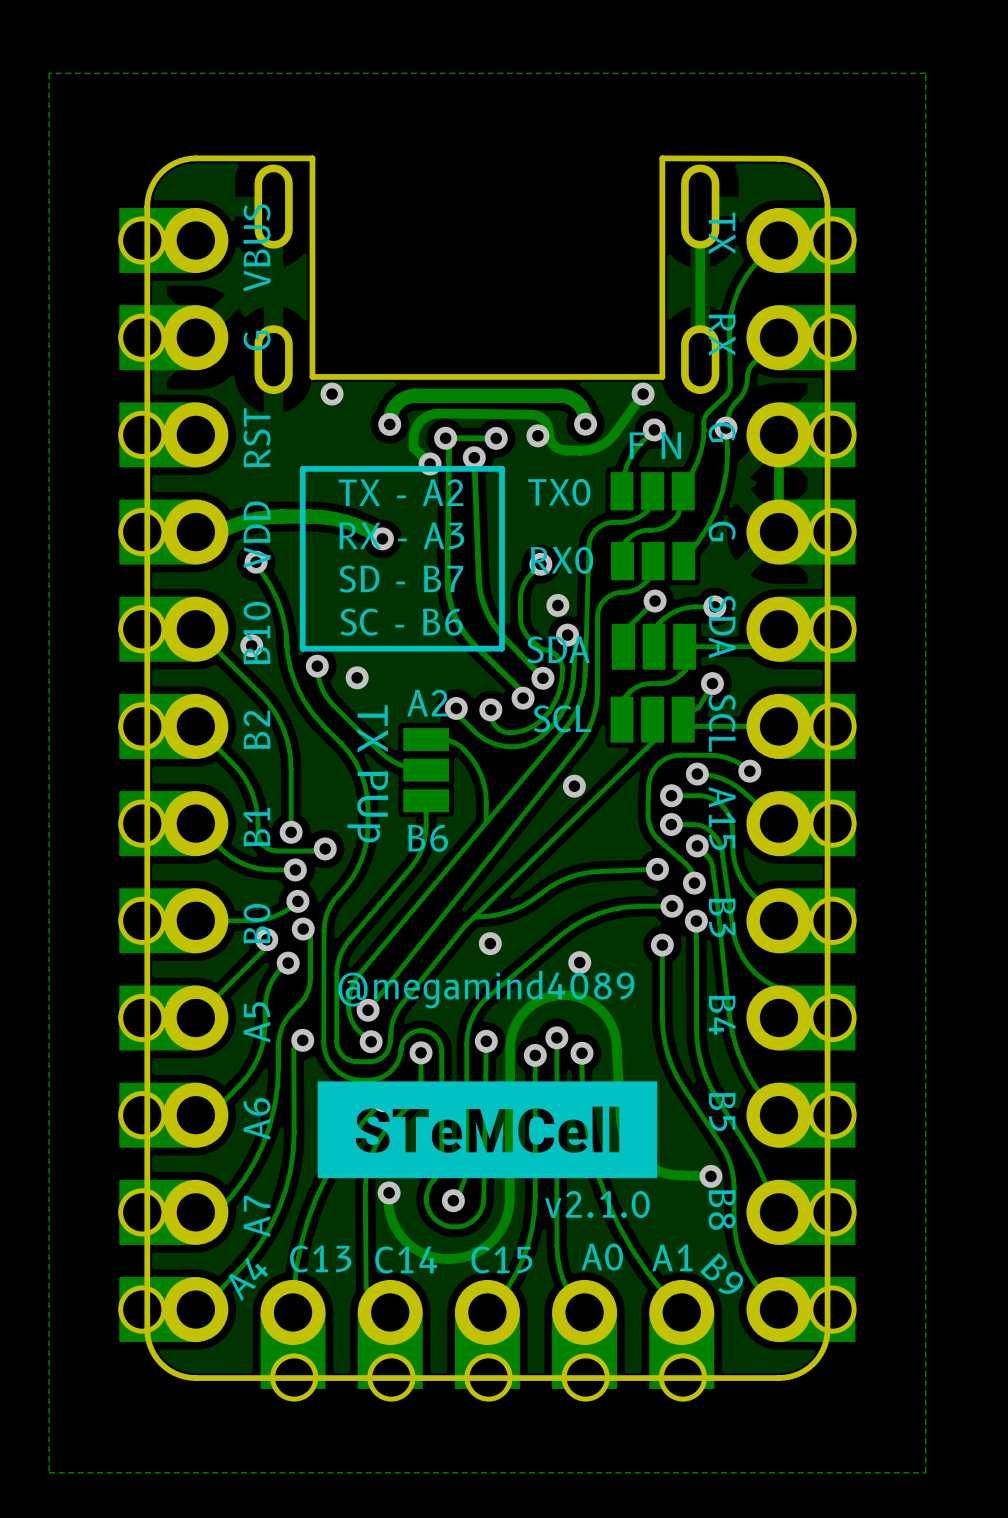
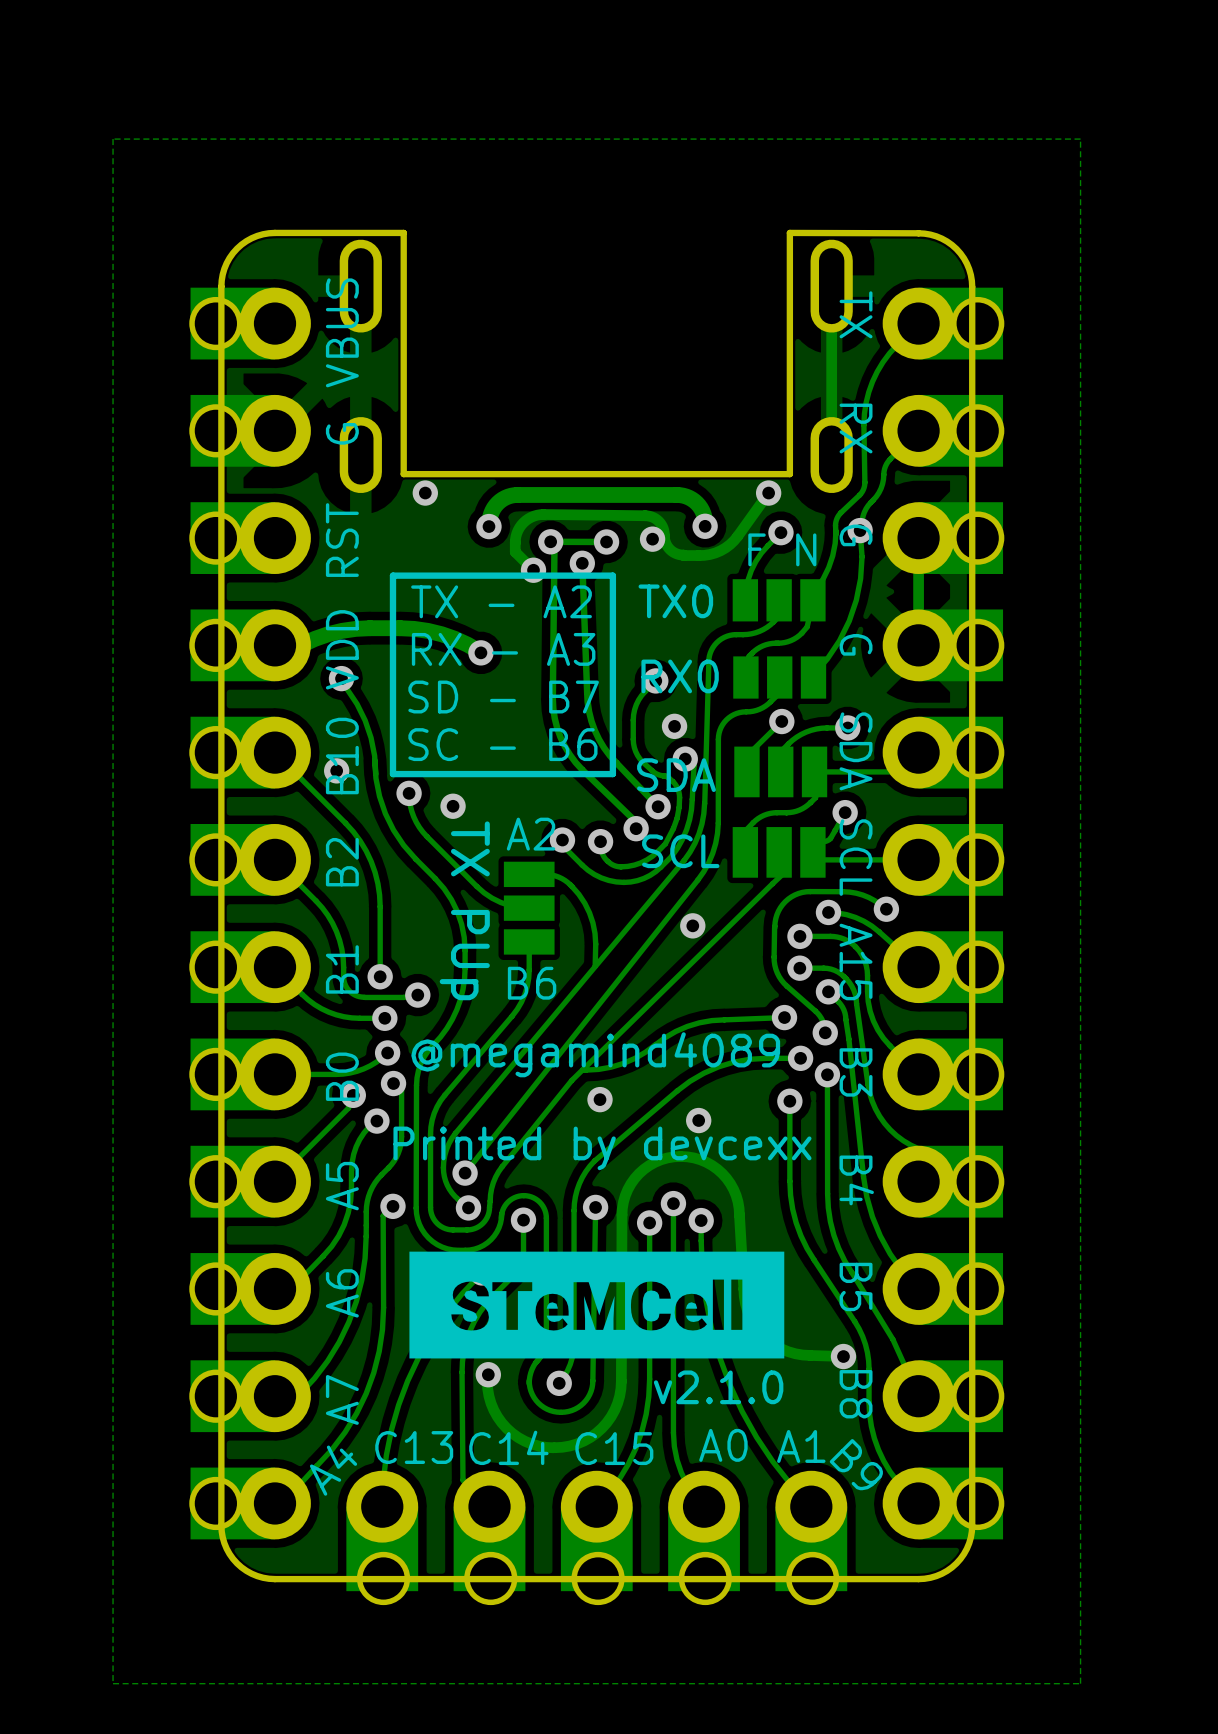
text: none -> @megamind4089 (595, 1054)
text: @megamind4089 (486, 989) -> Printed by devcexx (602, 1148)

